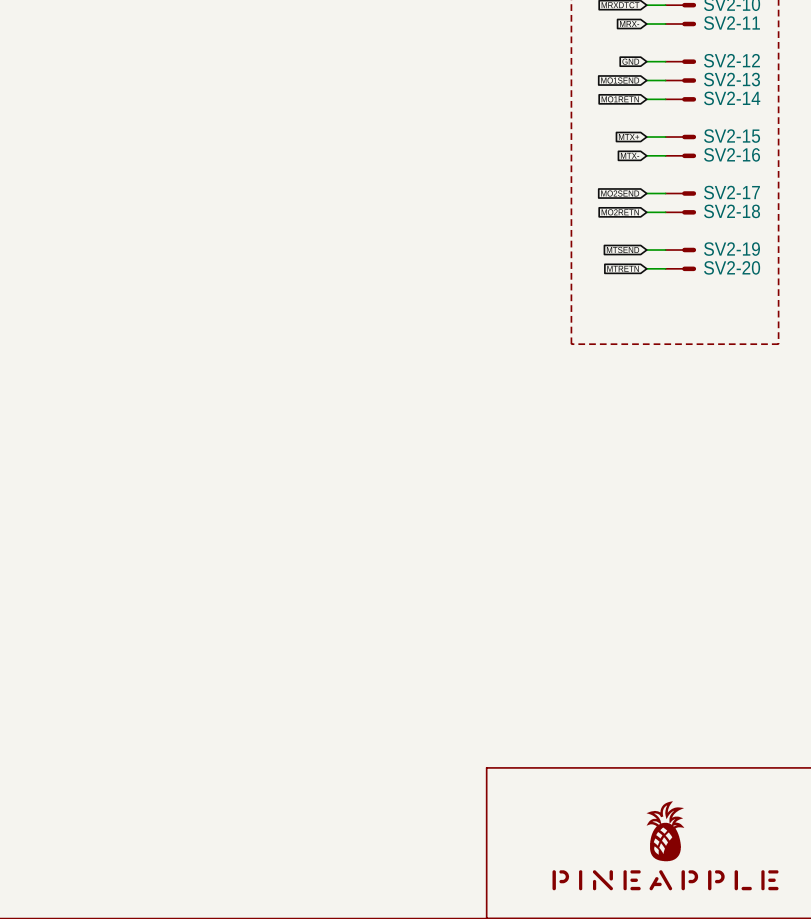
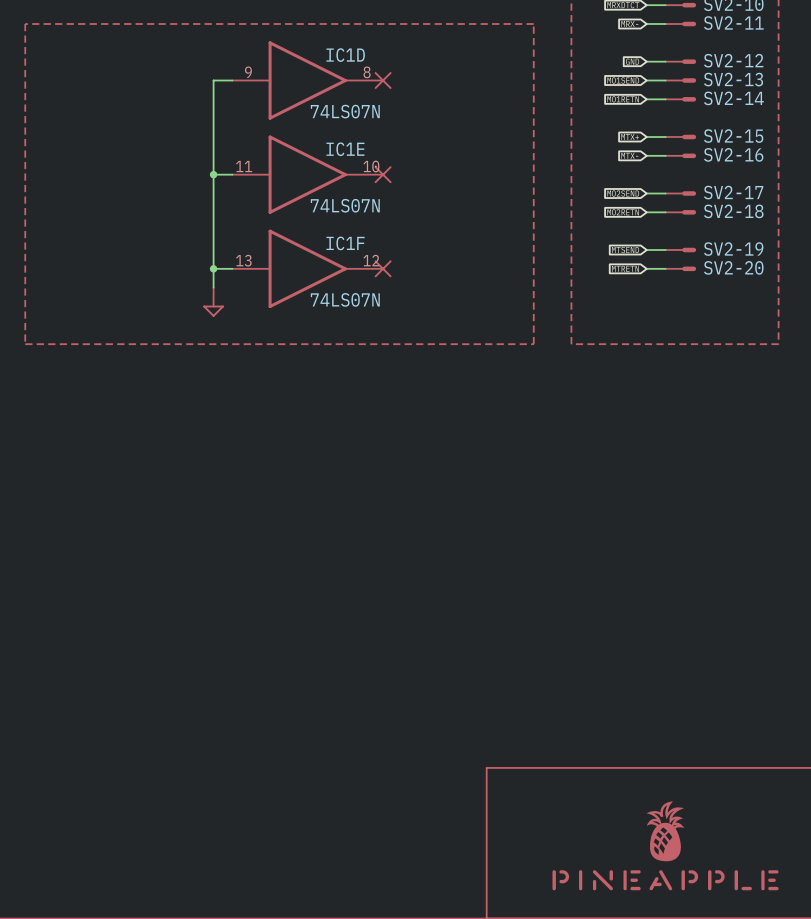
line: none -> (25, 24) (533, 24) (533, 344) (25, 344) (25, 24)
wire: none -> (232, 80) (213, 80) (213, 287)
IC1D: none -> 74LS07N (307, 80)
part: none -> (383, 80)
wire: none -> (213, 174) (232, 174)
junction: none -> (213, 174)
IC1E: none -> 74LS07N (307, 174)
part: none -> (383, 174)
wire: none -> (213, 268) (232, 268)
junction: none -> (213, 268)
IC1F: none -> 74LS07N (307, 268)
part: none -> (383, 268)
power symbol: none -> (213, 302)

